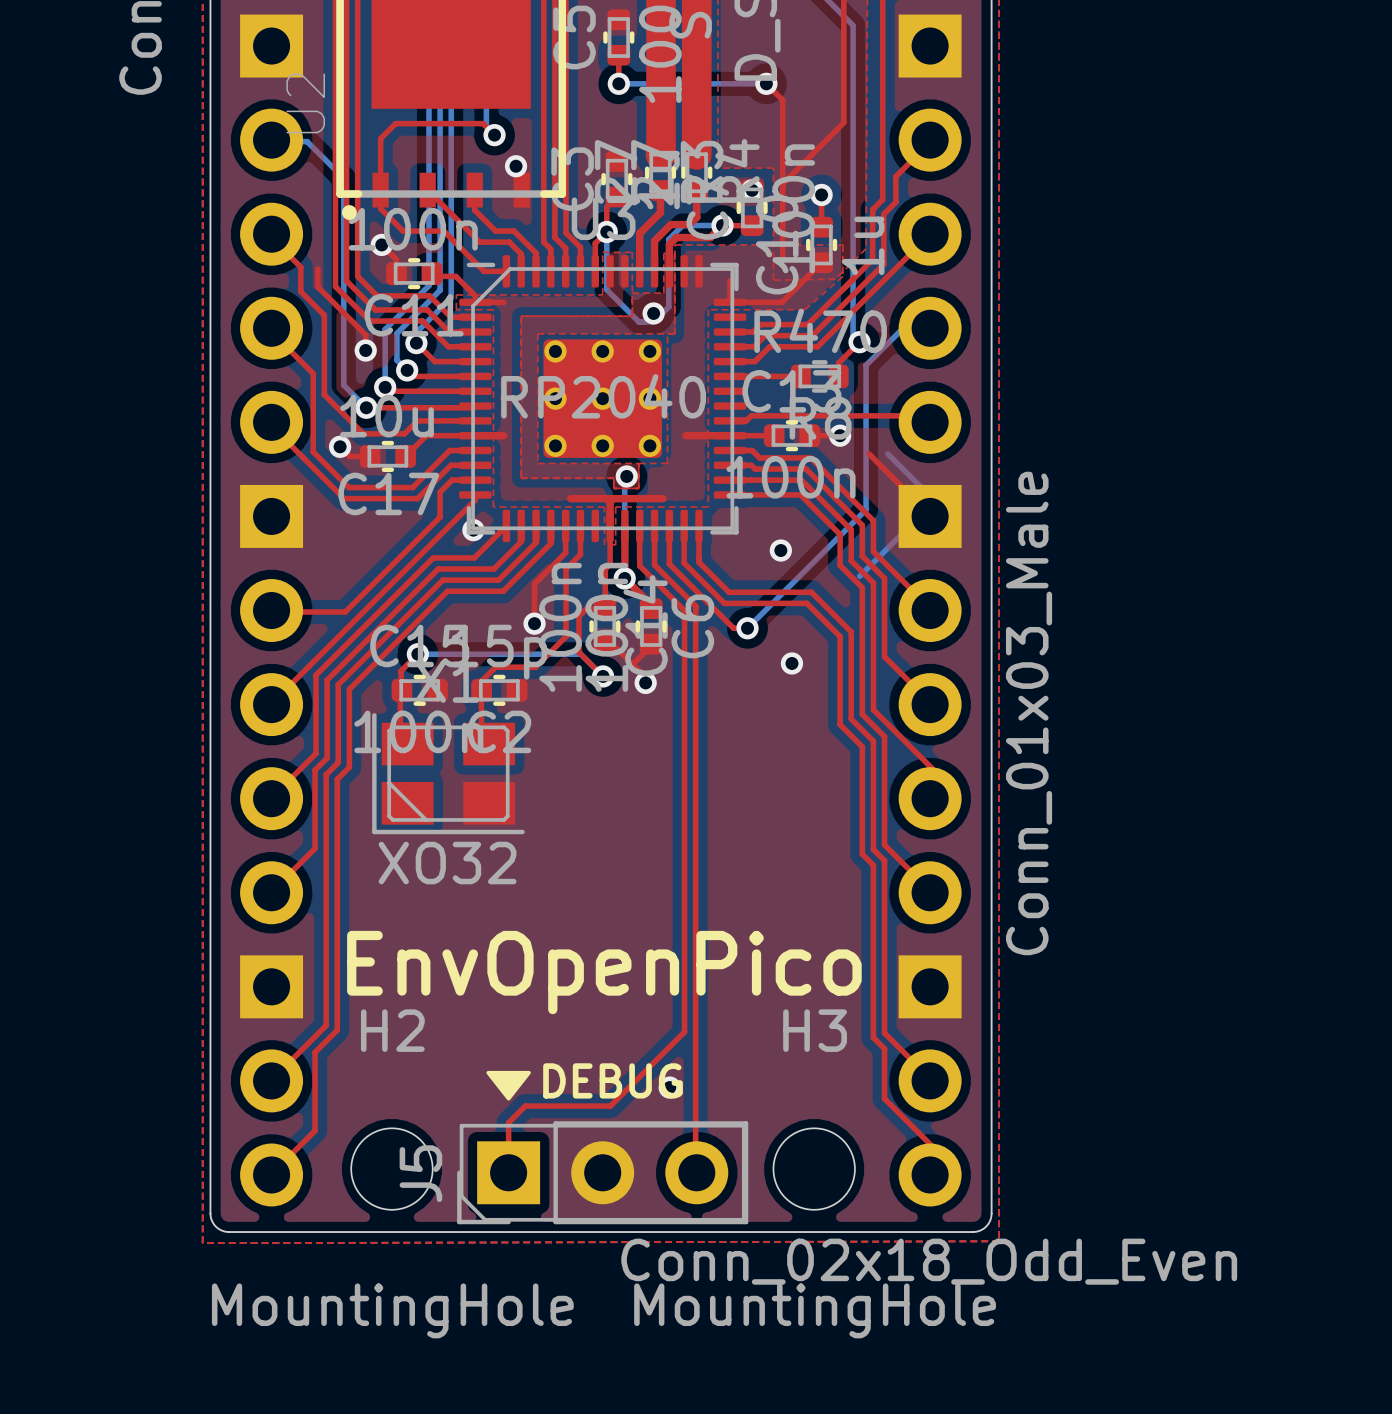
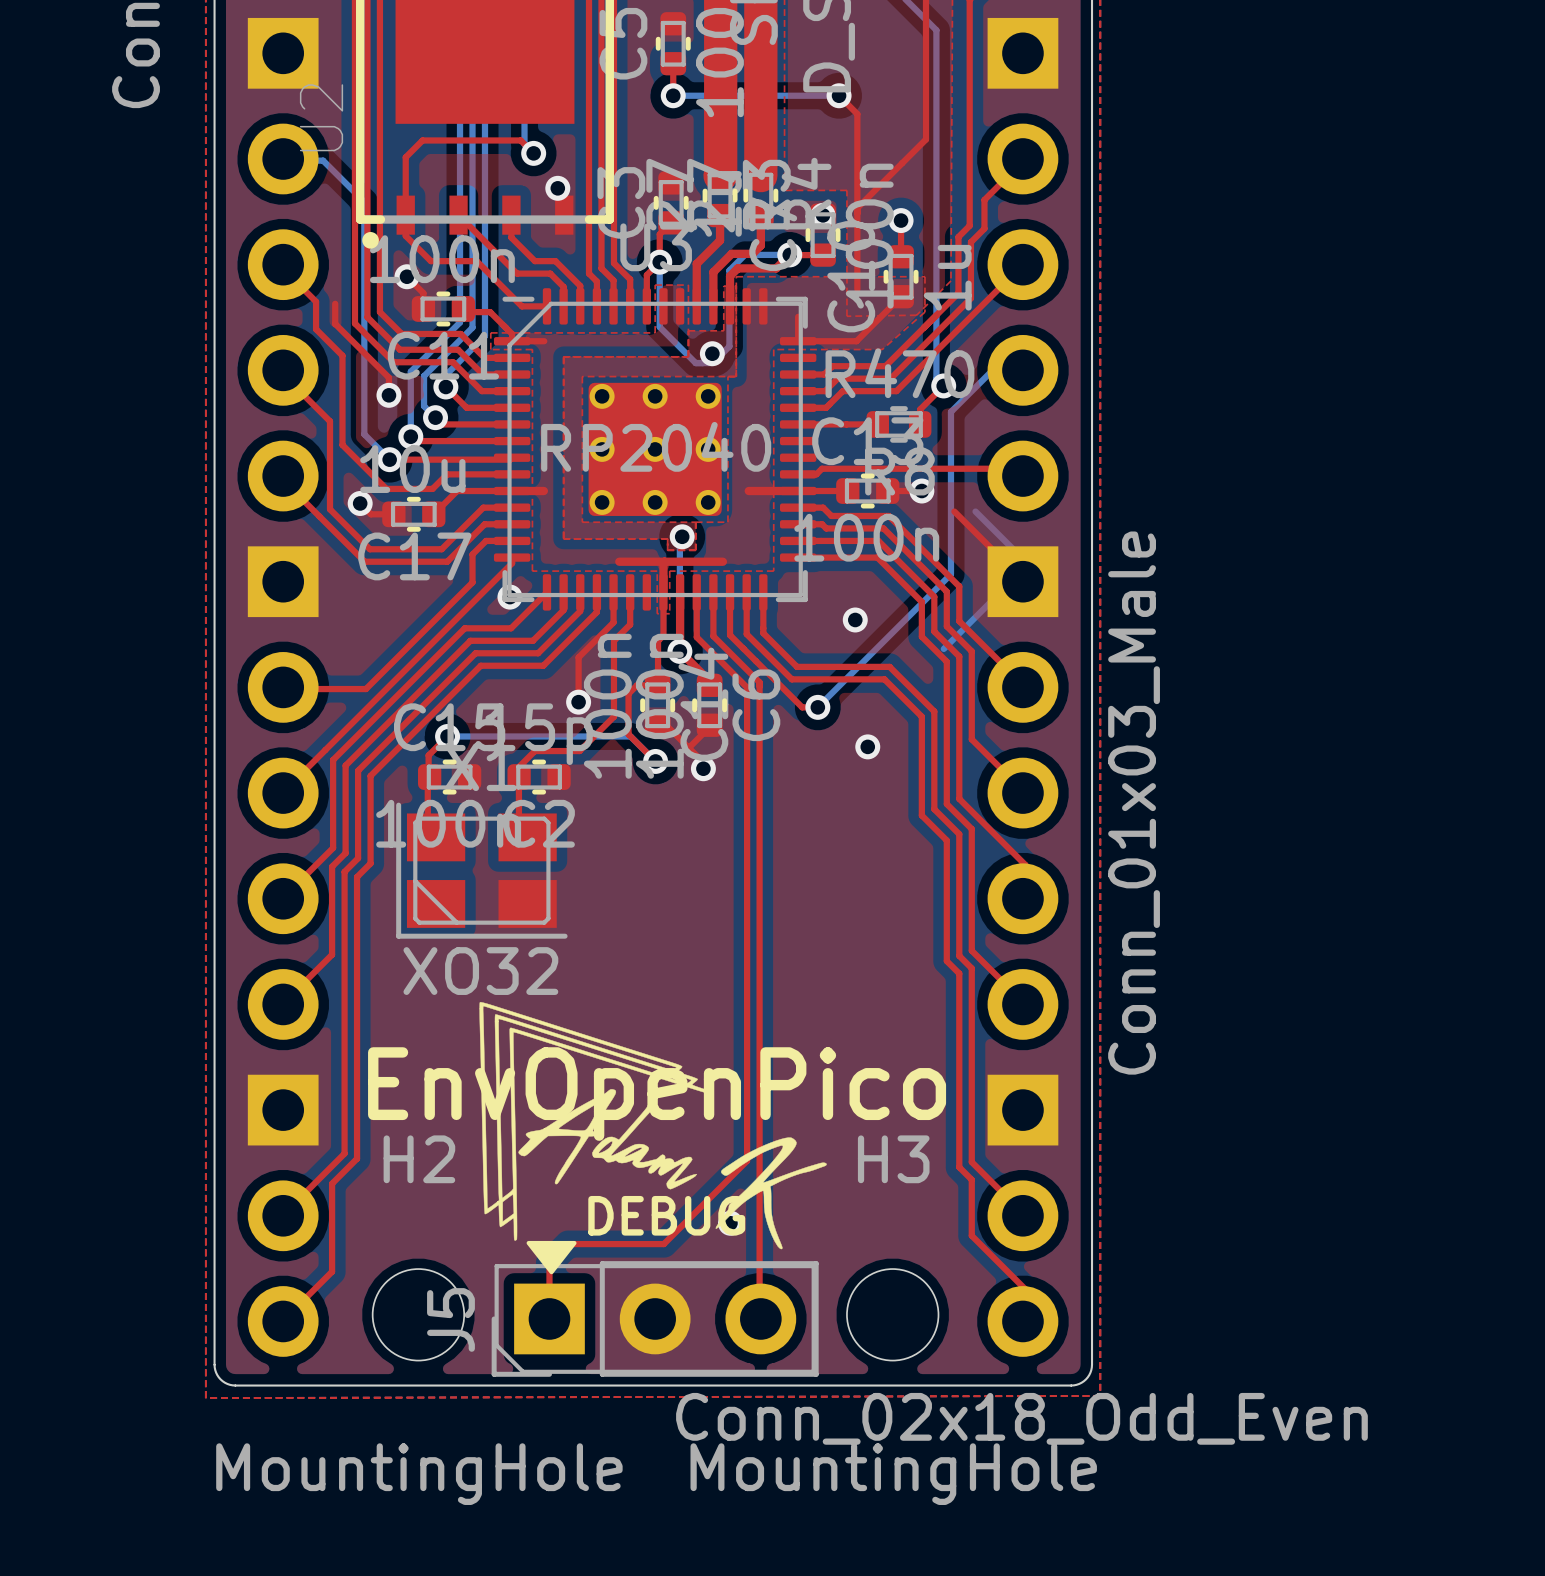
drawing: none -> [479, 1002, 827, 1250]
drawing position: (508, 1085) -> (551, 1257)

